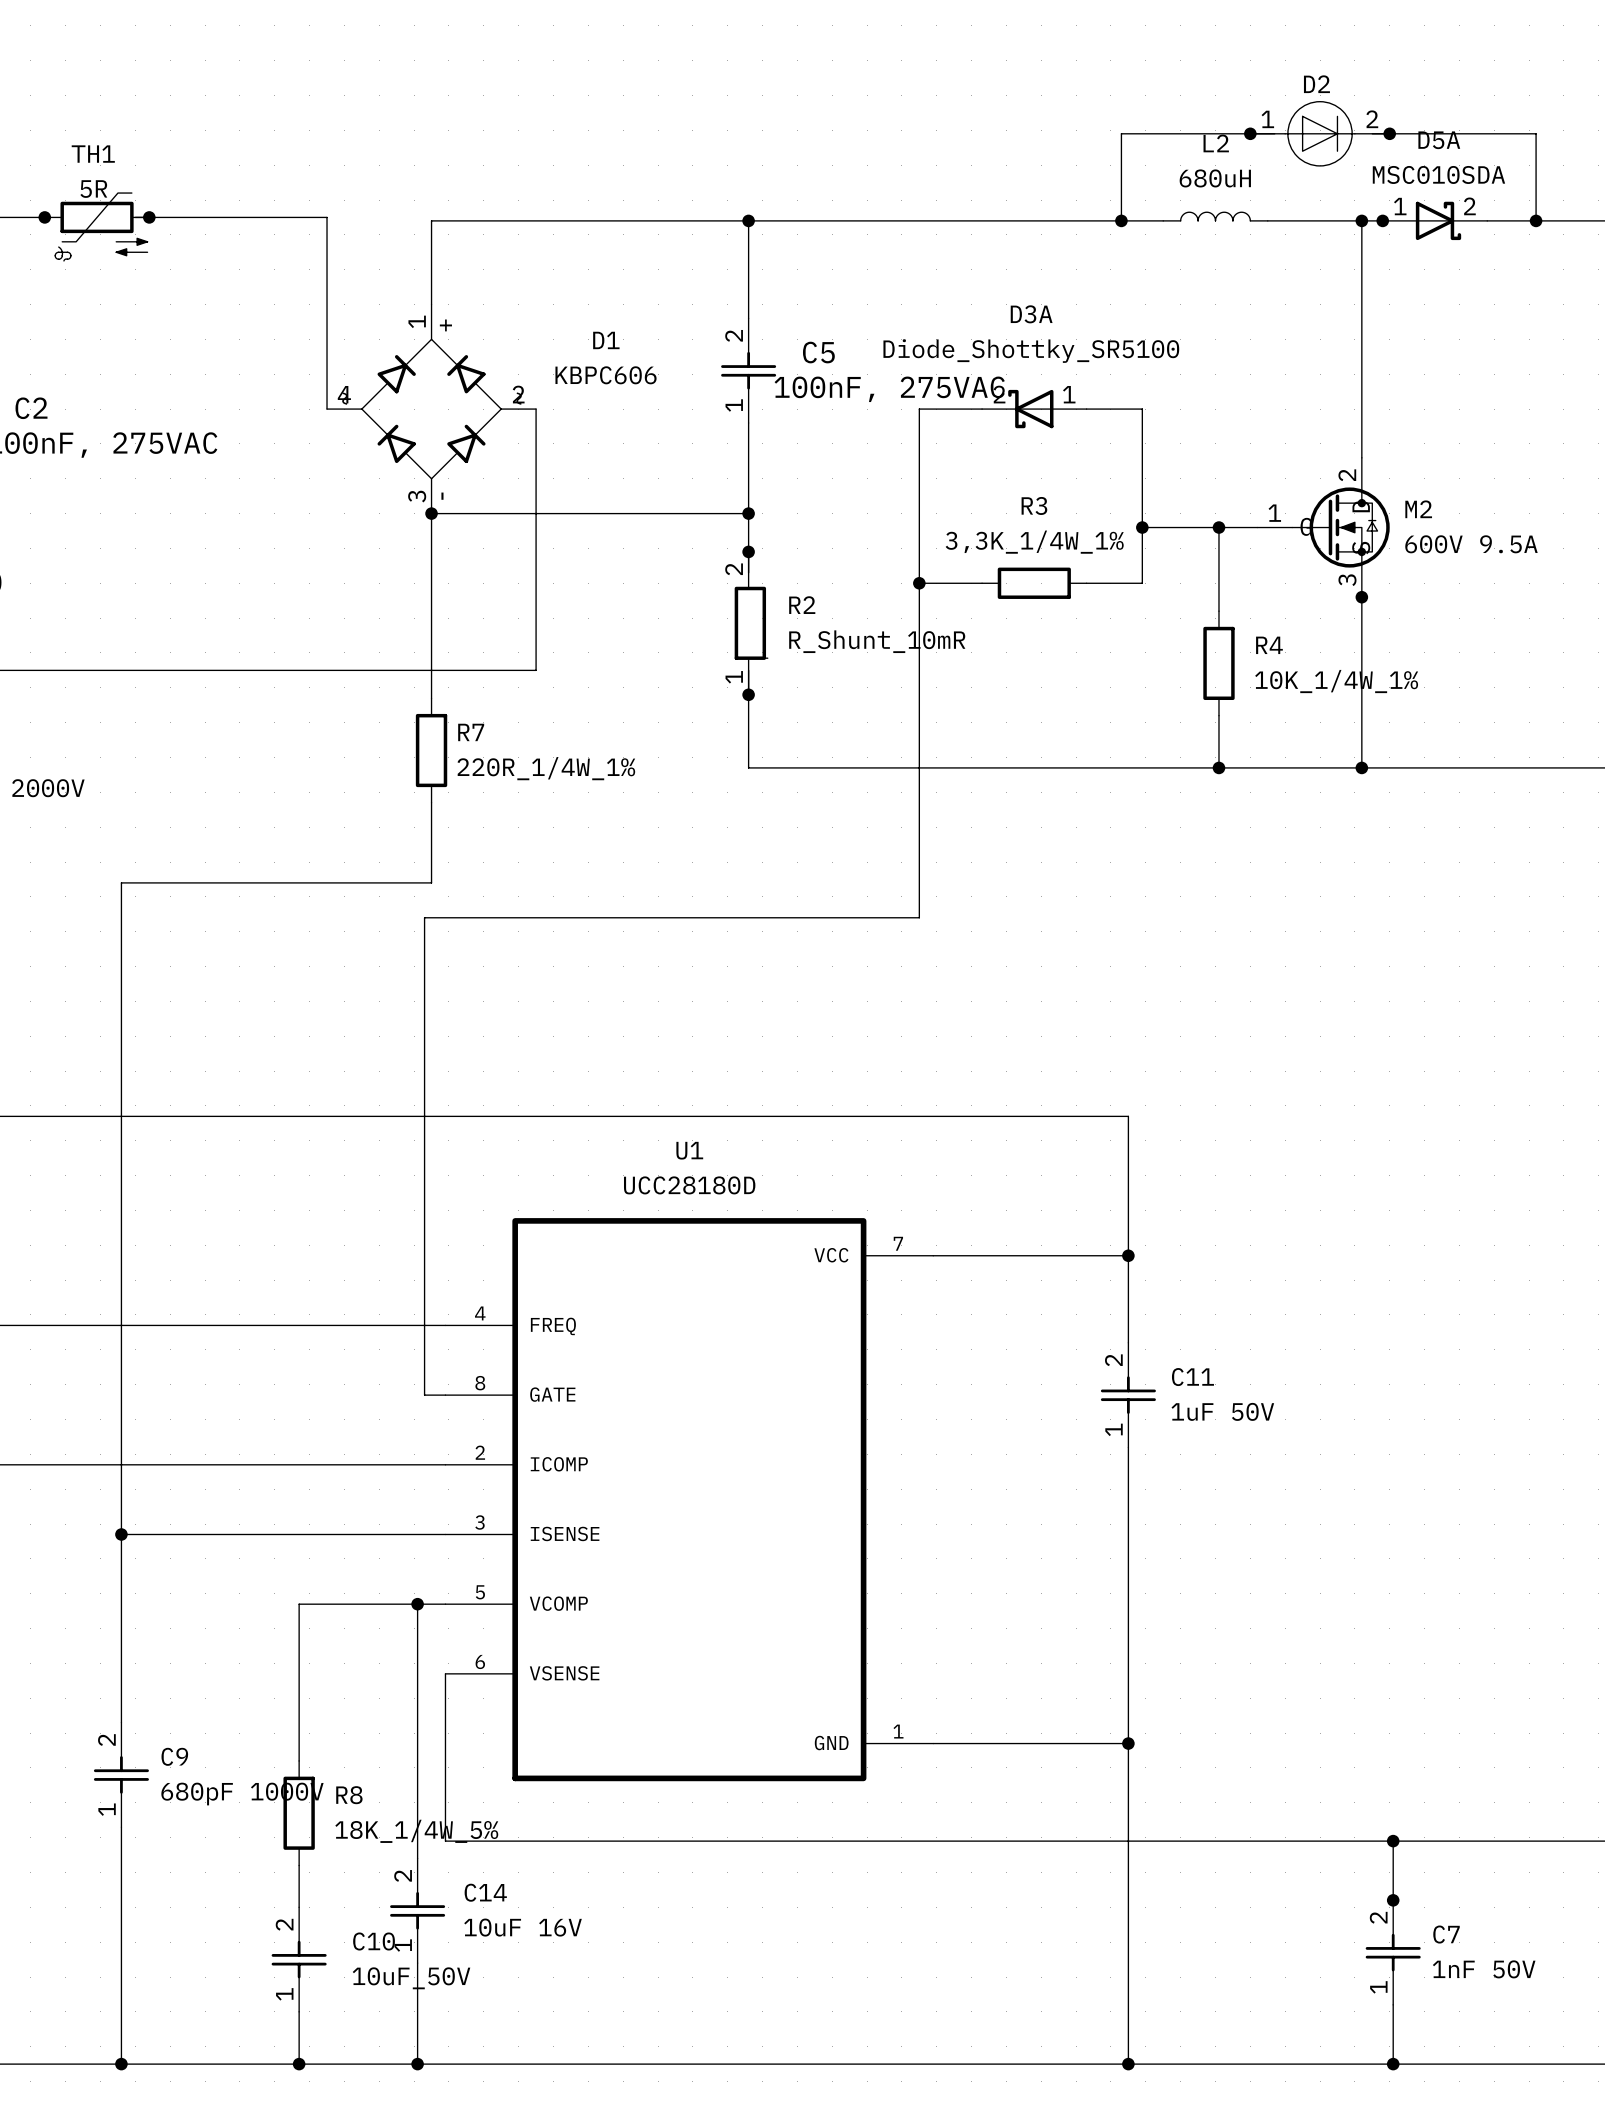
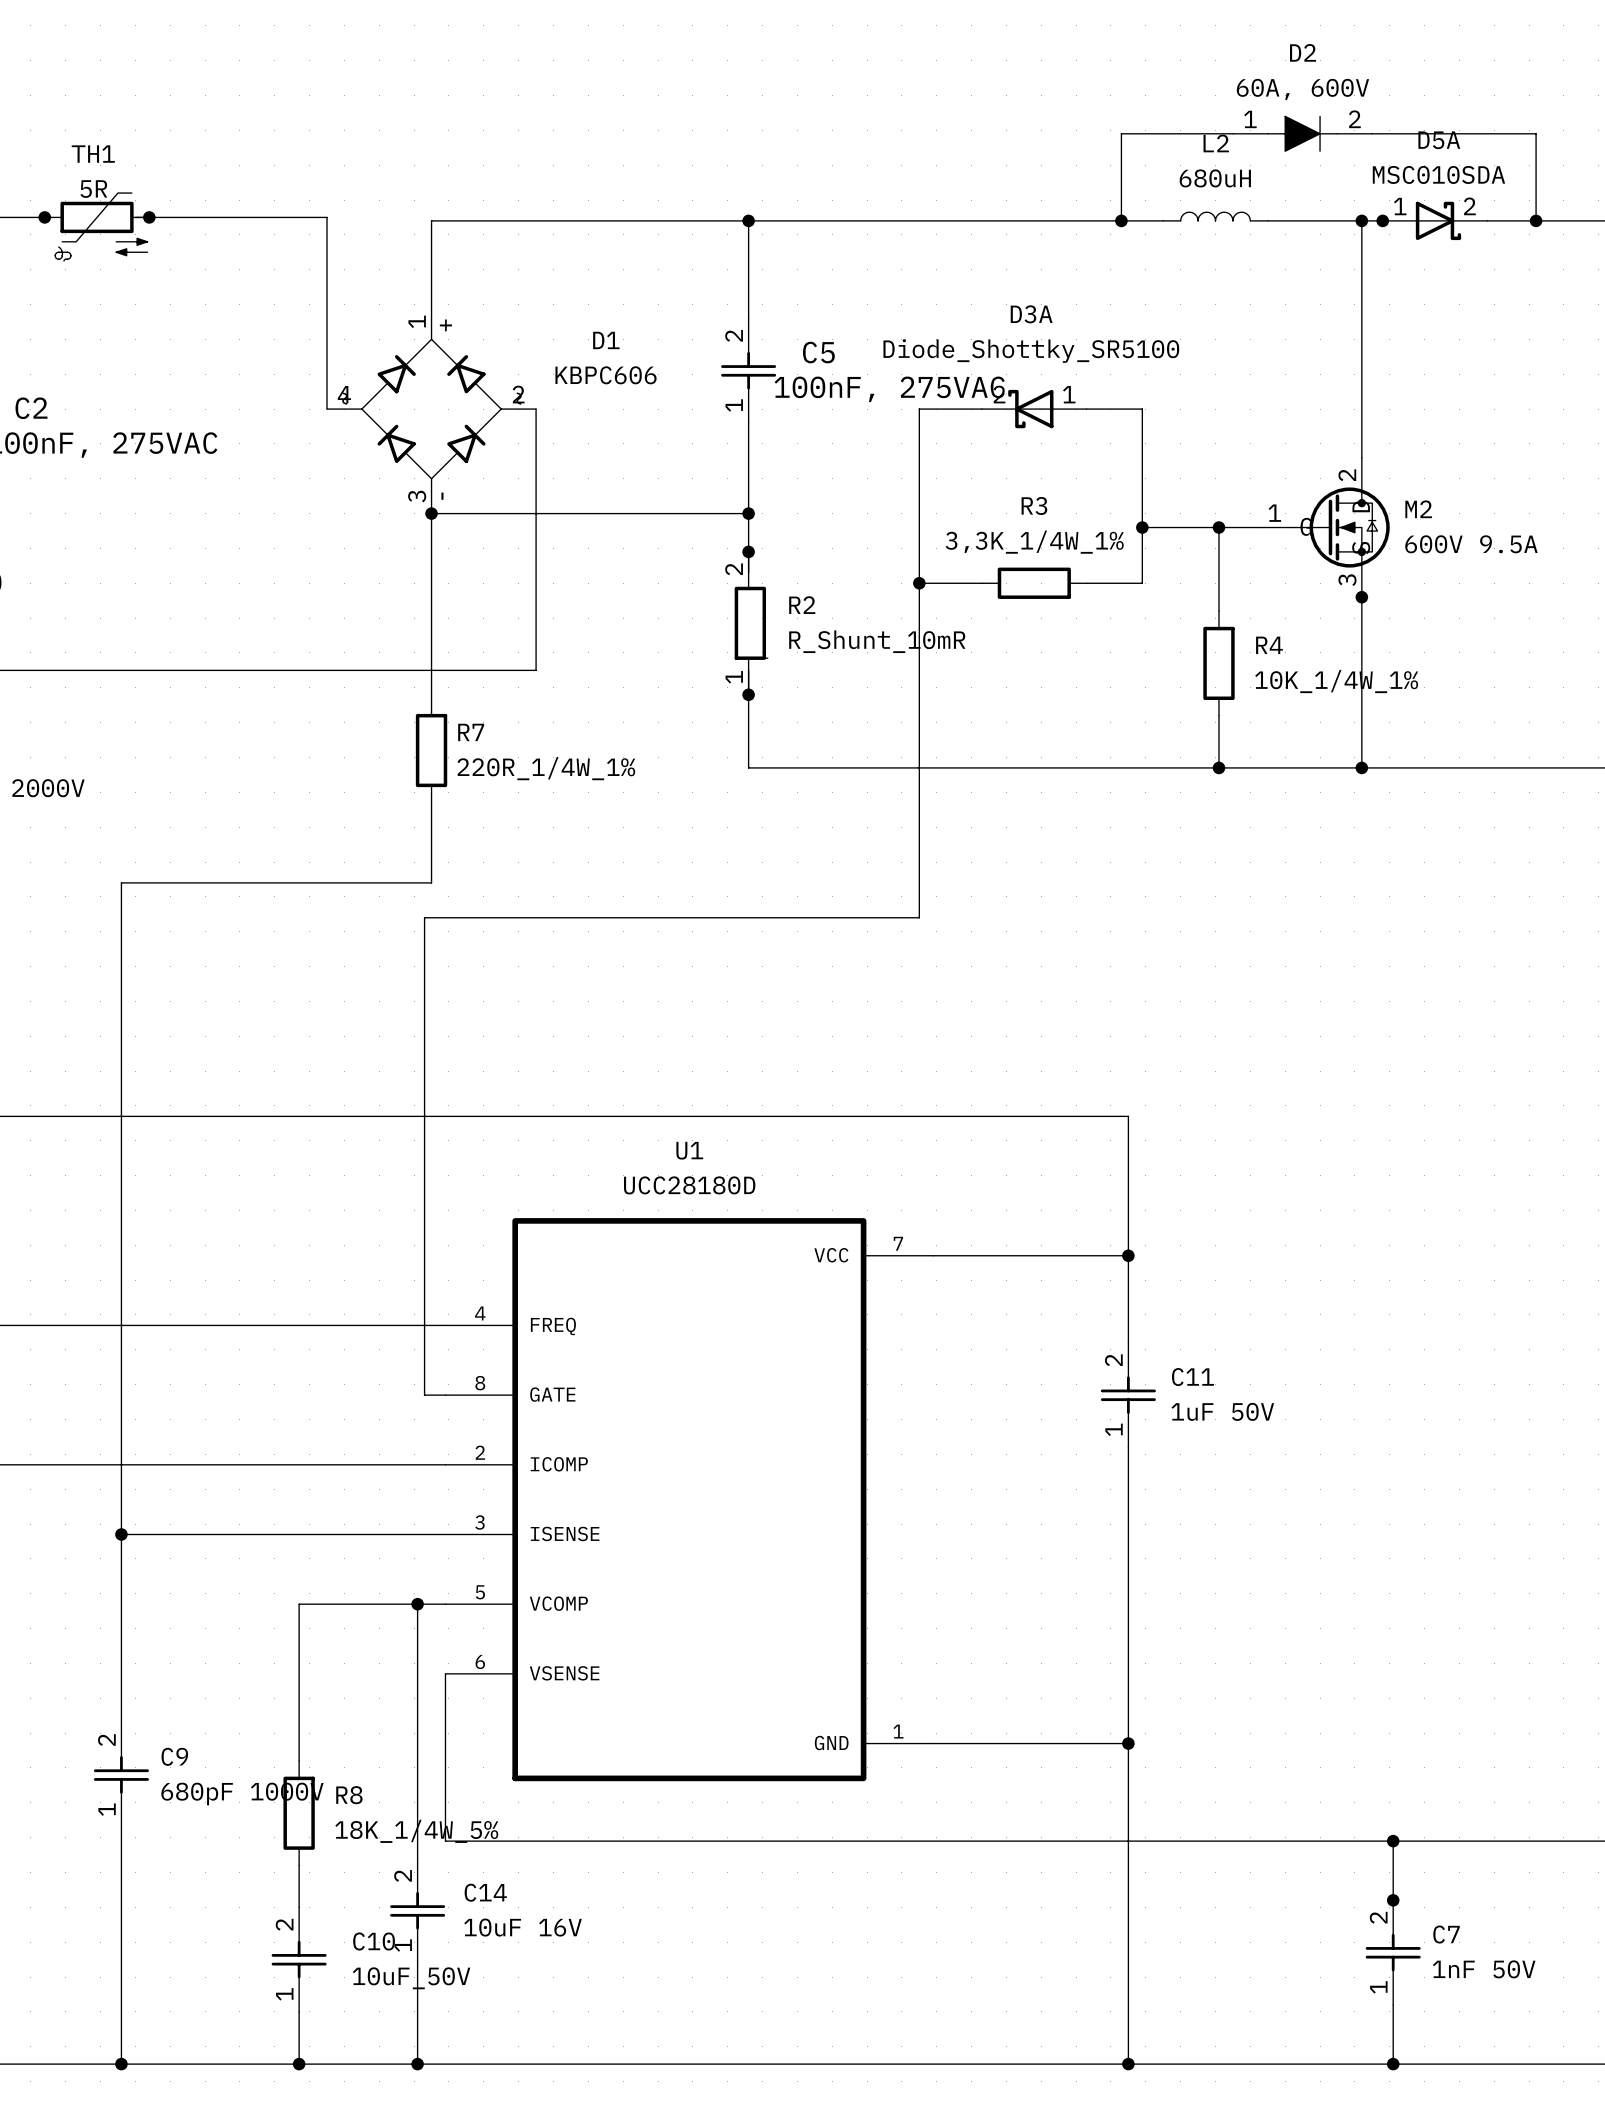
D2 name position: D2 (1316, 84) -> D2 (1303, 52)
D2 value: none -> 60A, 600V (1302, 89)
D2 symbol: [1250, 101, 1390, 166] -> [1232, 116, 1373, 152]
junction: (1250, 133) -> none
junction: (1389, 133) -> none

